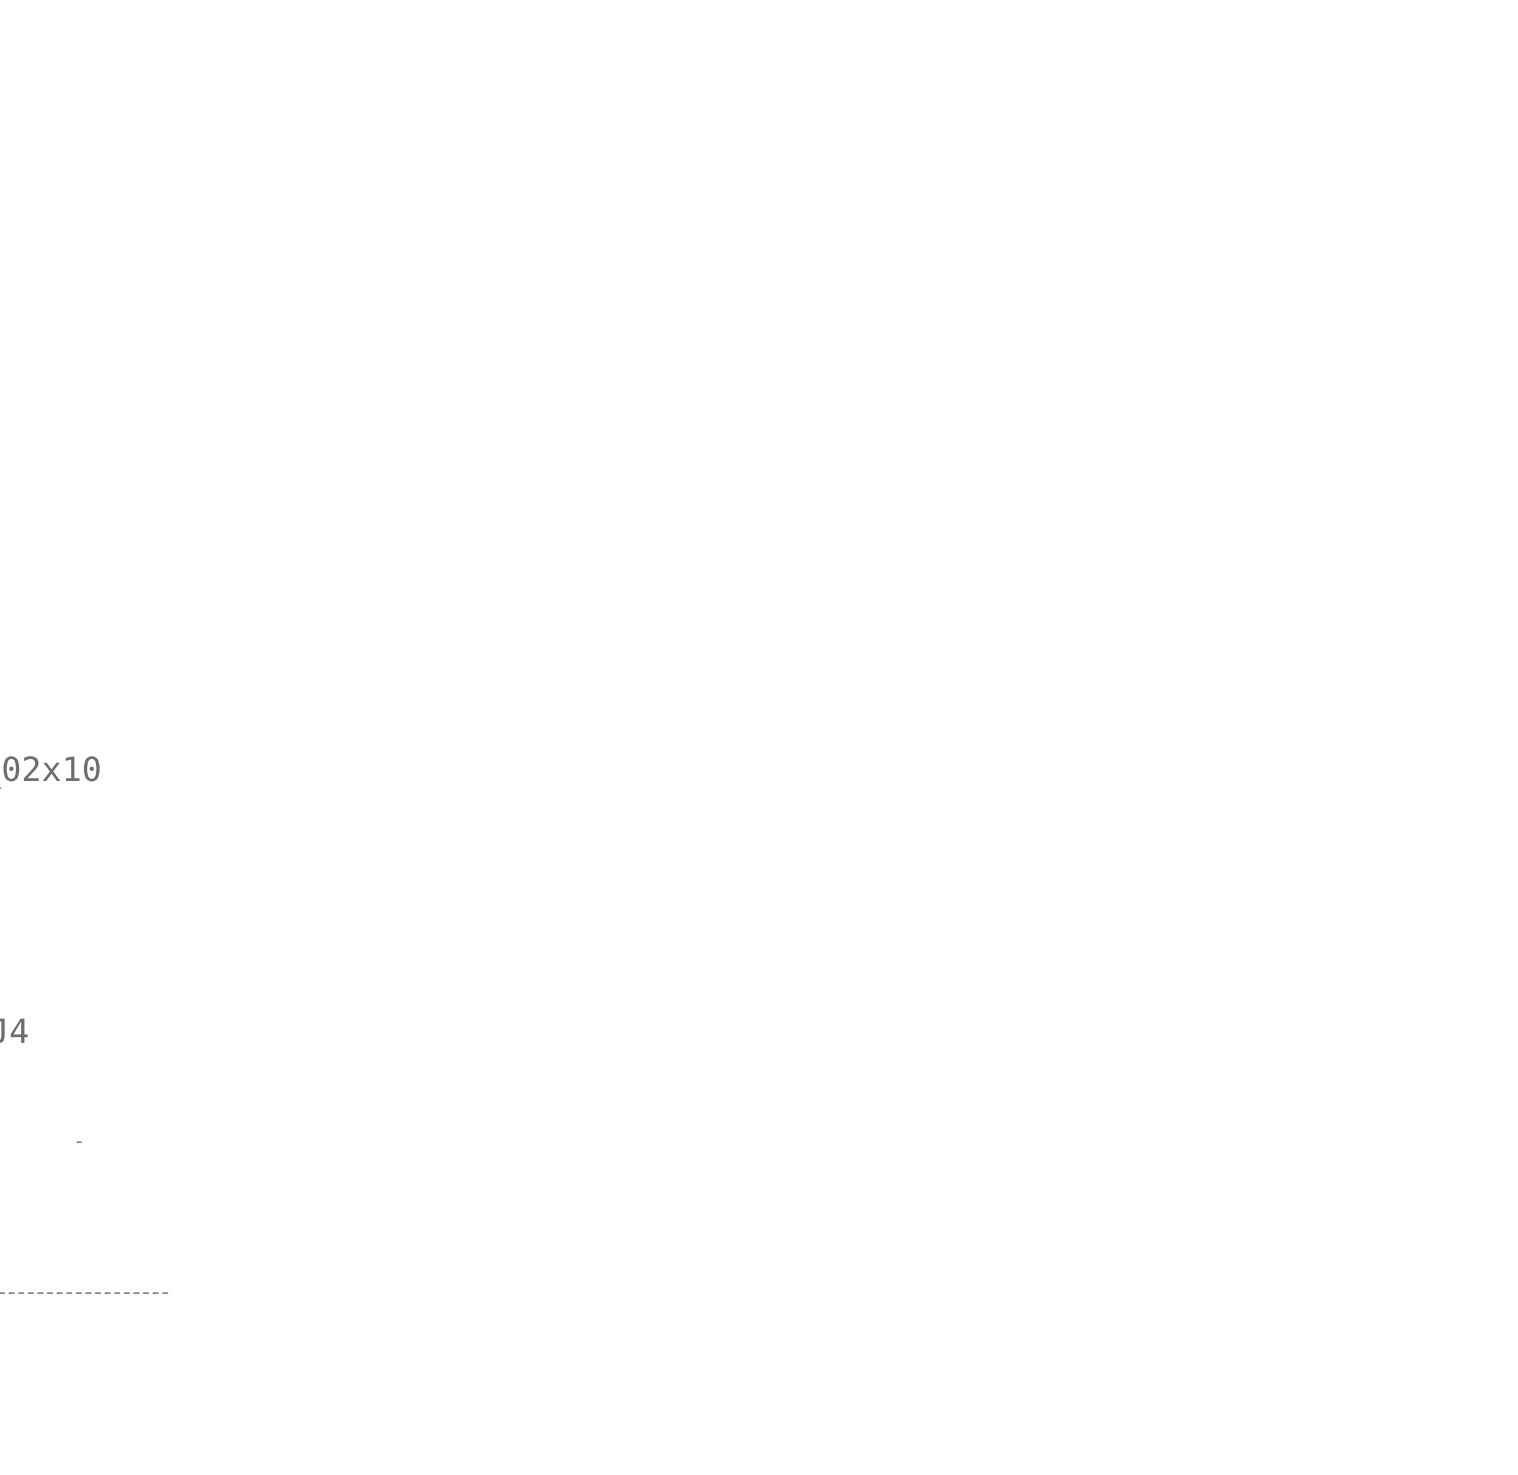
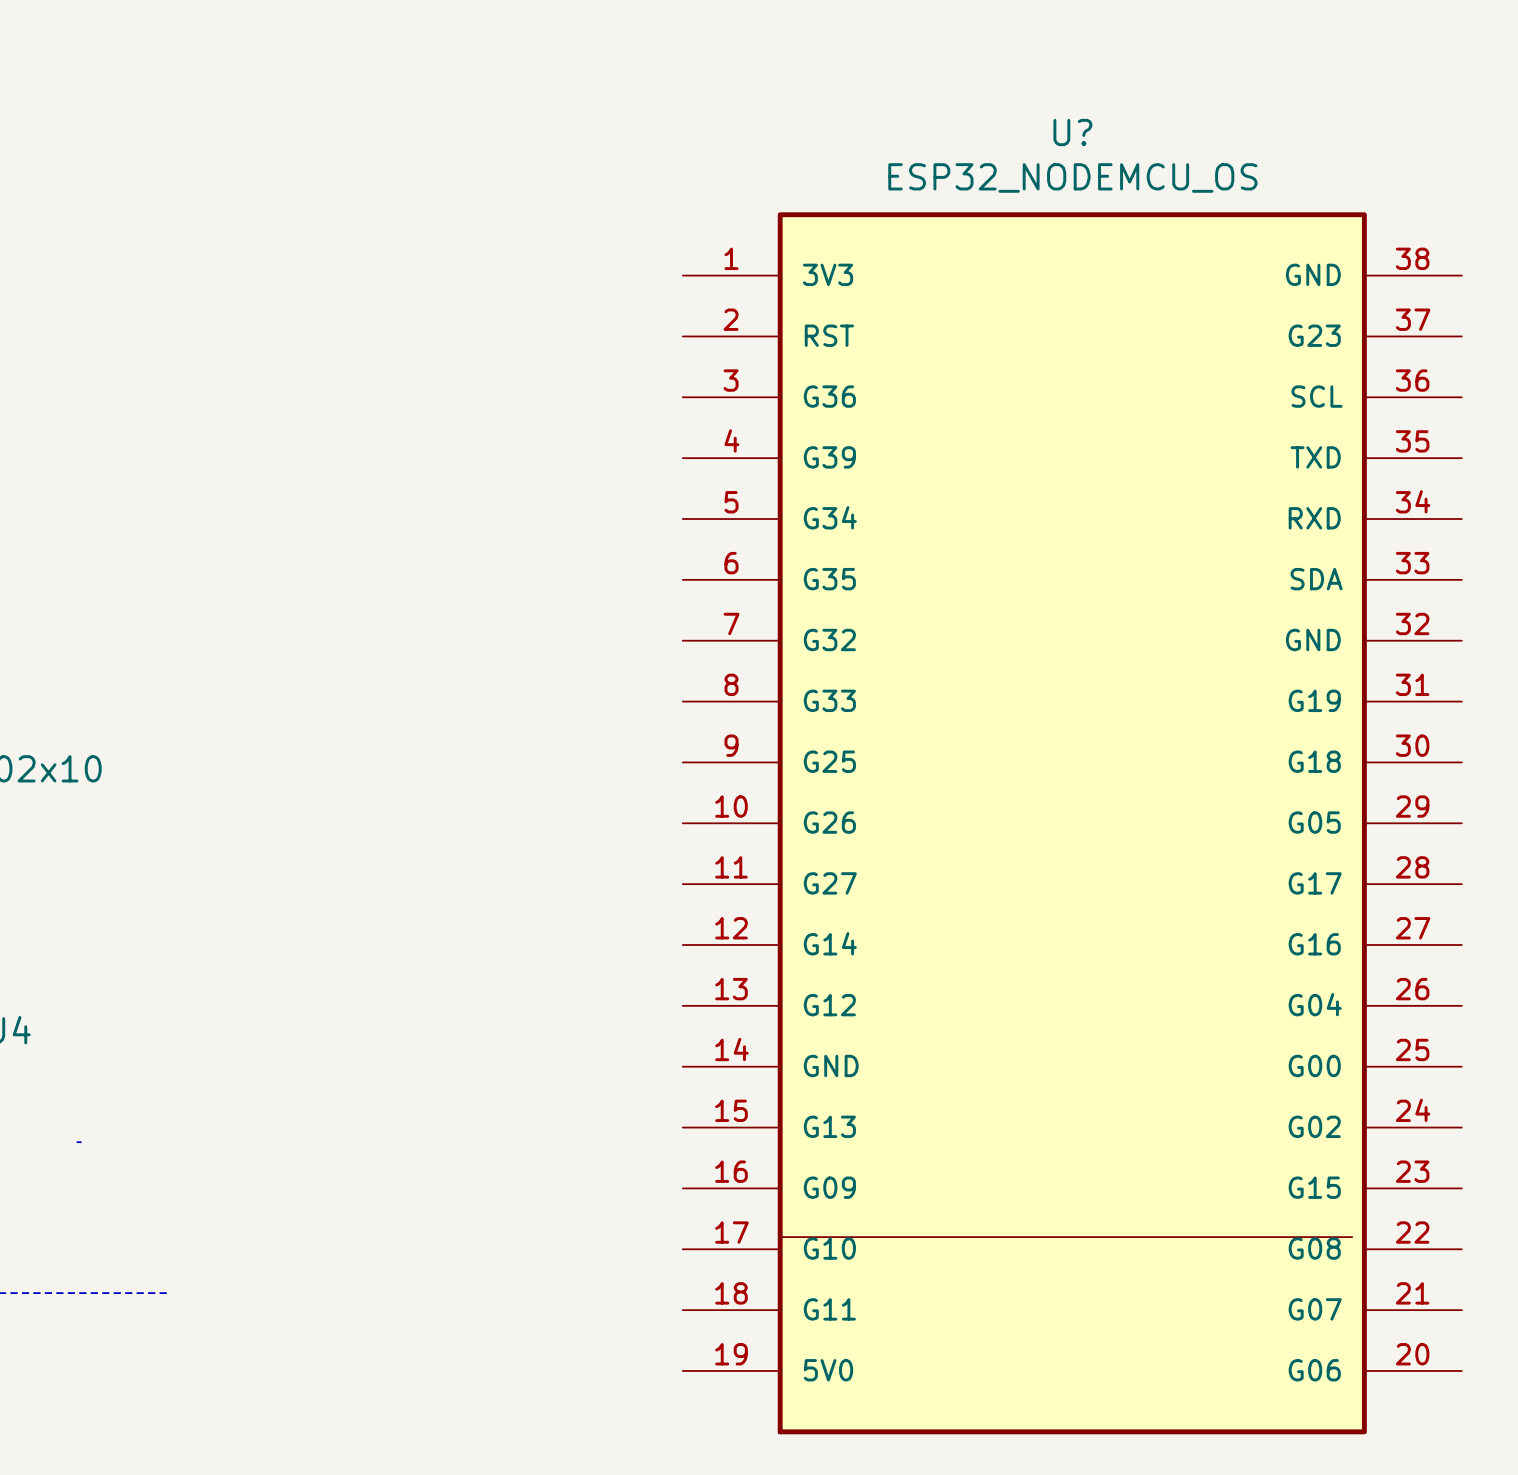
U?: none -> ESP32_NODEMCU_OS (1072, 823)

